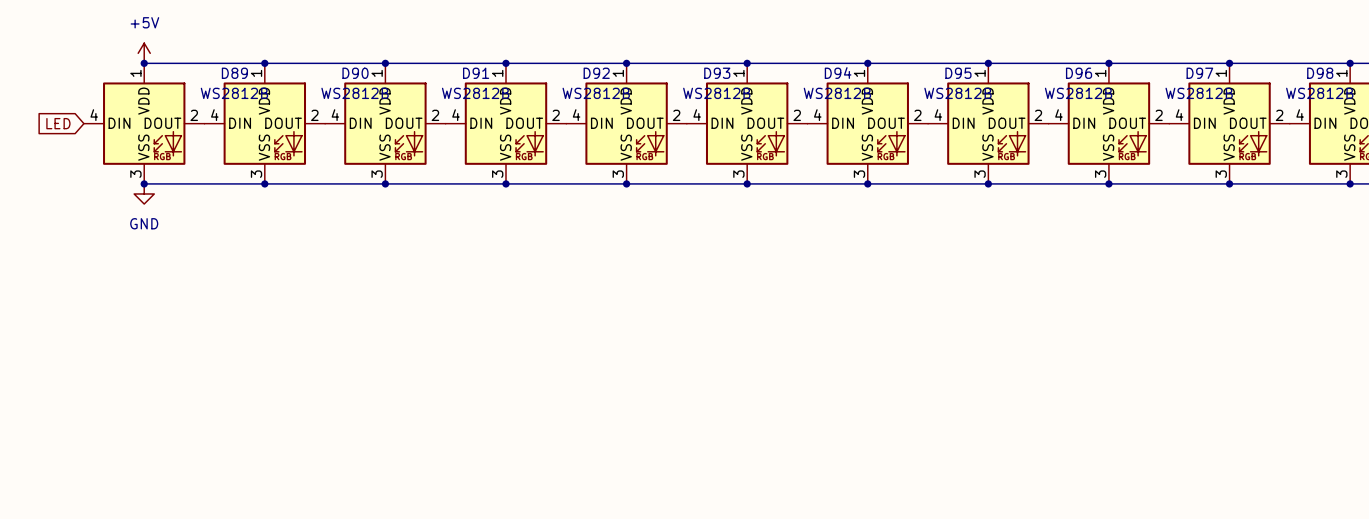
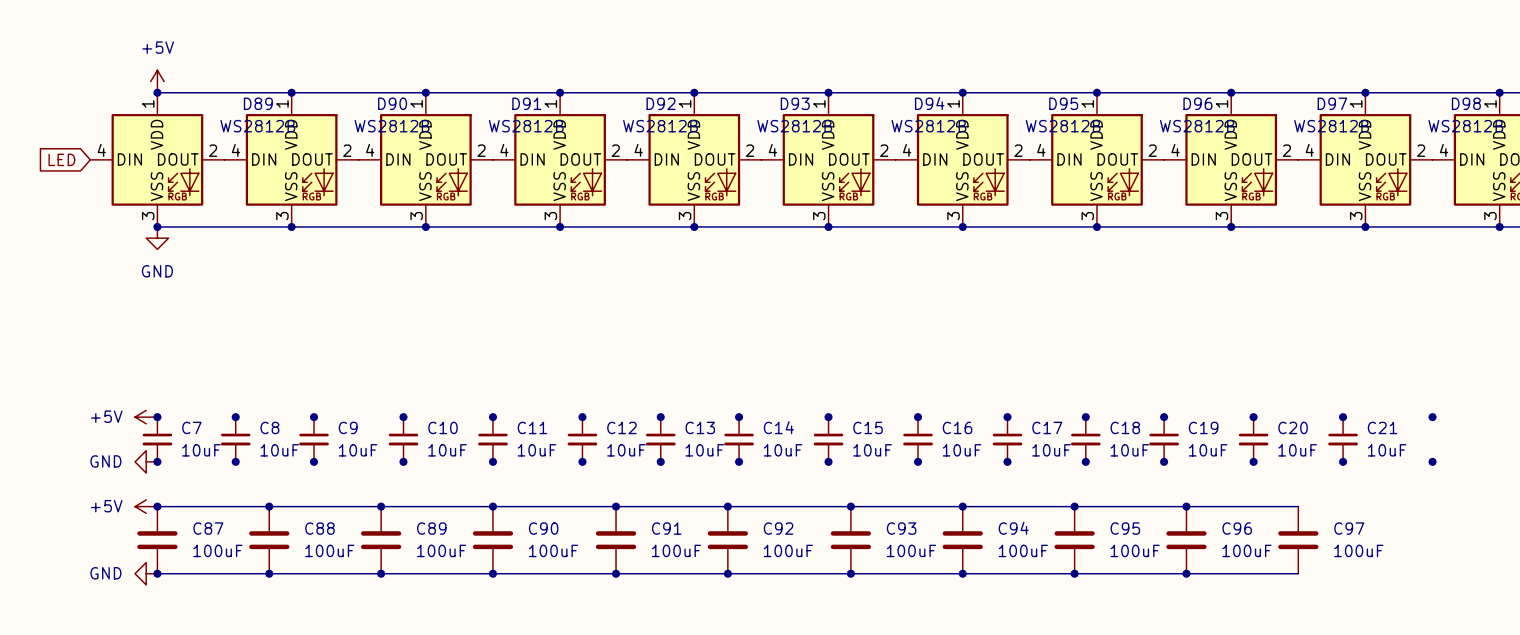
power symbol: none -> +5V (146, 417)
junction: none -> (157, 417)
junction: none -> (235, 417)
junction: none -> (314, 417)
junction: none -> (403, 417)
junction: none -> (492, 417)
junction: none -> (582, 417)
junction: none -> (660, 417)
junction: none -> (739, 417)
junction: none -> (828, 417)
junction: none -> (918, 417)
junction: none -> (1007, 417)
junction: none -> (1085, 417)
junction: none -> (1164, 417)
junction: none -> (1253, 417)
junction: none -> (1343, 417)
junction: none -> (1432, 417)
C7: none -> 10uF (157, 439)
C8: none -> 10uF (235, 439)
C9: none -> 10uF (314, 439)
C10: none -> 10uF (403, 439)
C11: none -> 10uF (492, 439)
C12: none -> 10uF (582, 439)
C13: none -> 10uF (660, 439)
C14: none -> 10uF (739, 439)
C15: none -> 10uF (828, 439)
C16: none -> 10uF (918, 439)
C17: none -> 10uF (1007, 439)
C18: none -> 10uF (1085, 439)
C19: none -> 10uF (1164, 439)
C20: none -> 10uF (1253, 439)
C21: none -> 10uF (1343, 439)
power symbol: none -> GND (146, 461)
junction: none -> (157, 461)
junction: none -> (235, 461)
junction: none -> (314, 461)
junction: none -> (403, 461)
junction: none -> (492, 461)
junction: none -> (582, 461)
junction: none -> (660, 461)
junction: none -> (739, 461)
junction: none -> (828, 461)
junction: none -> (918, 461)
junction: none -> (1007, 461)
junction: none -> (1085, 461)
junction: none -> (1164, 461)
junction: none -> (1253, 461)
junction: none -> (1343, 461)
junction: none -> (1432, 461)
power symbol: none -> +5V (146, 506)
wire: none -> (157, 506) (1298, 506)
junction: none -> (157, 506)
junction: none -> (269, 506)
junction: none -> (381, 506)
junction: none -> (492, 506)
junction: none -> (616, 506)
junction: none -> (727, 506)
junction: none -> (850, 506)
junction: none -> (962, 506)
junction: none -> (1074, 506)
junction: none -> (1186, 506)
C87: none -> 100uF (157, 540)
C88: none -> 100uF (269, 540)
C89: none -> 100uF (381, 540)
C90: none -> 100uF (492, 540)
C91: none -> 100uF (616, 540)
C92: none -> 100uF (727, 540)
C93: none -> 100uF (850, 540)
C94: none -> 100uF (962, 540)
C95: none -> 100uF (1074, 540)
C96: none -> 100uF (1186, 540)
C97: none -> 100uF (1298, 540)
power symbol: none -> GND (146, 573)
wire: none -> (157, 573) (1298, 573)
junction: none -> (157, 573)
junction: none -> (269, 573)
junction: none -> (381, 573)
junction: none -> (492, 573)
junction: none -> (616, 573)
junction: none -> (727, 573)
junction: none -> (850, 573)
junction: none -> (962, 573)
junction: none -> (1074, 573)
junction: none -> (1186, 573)

